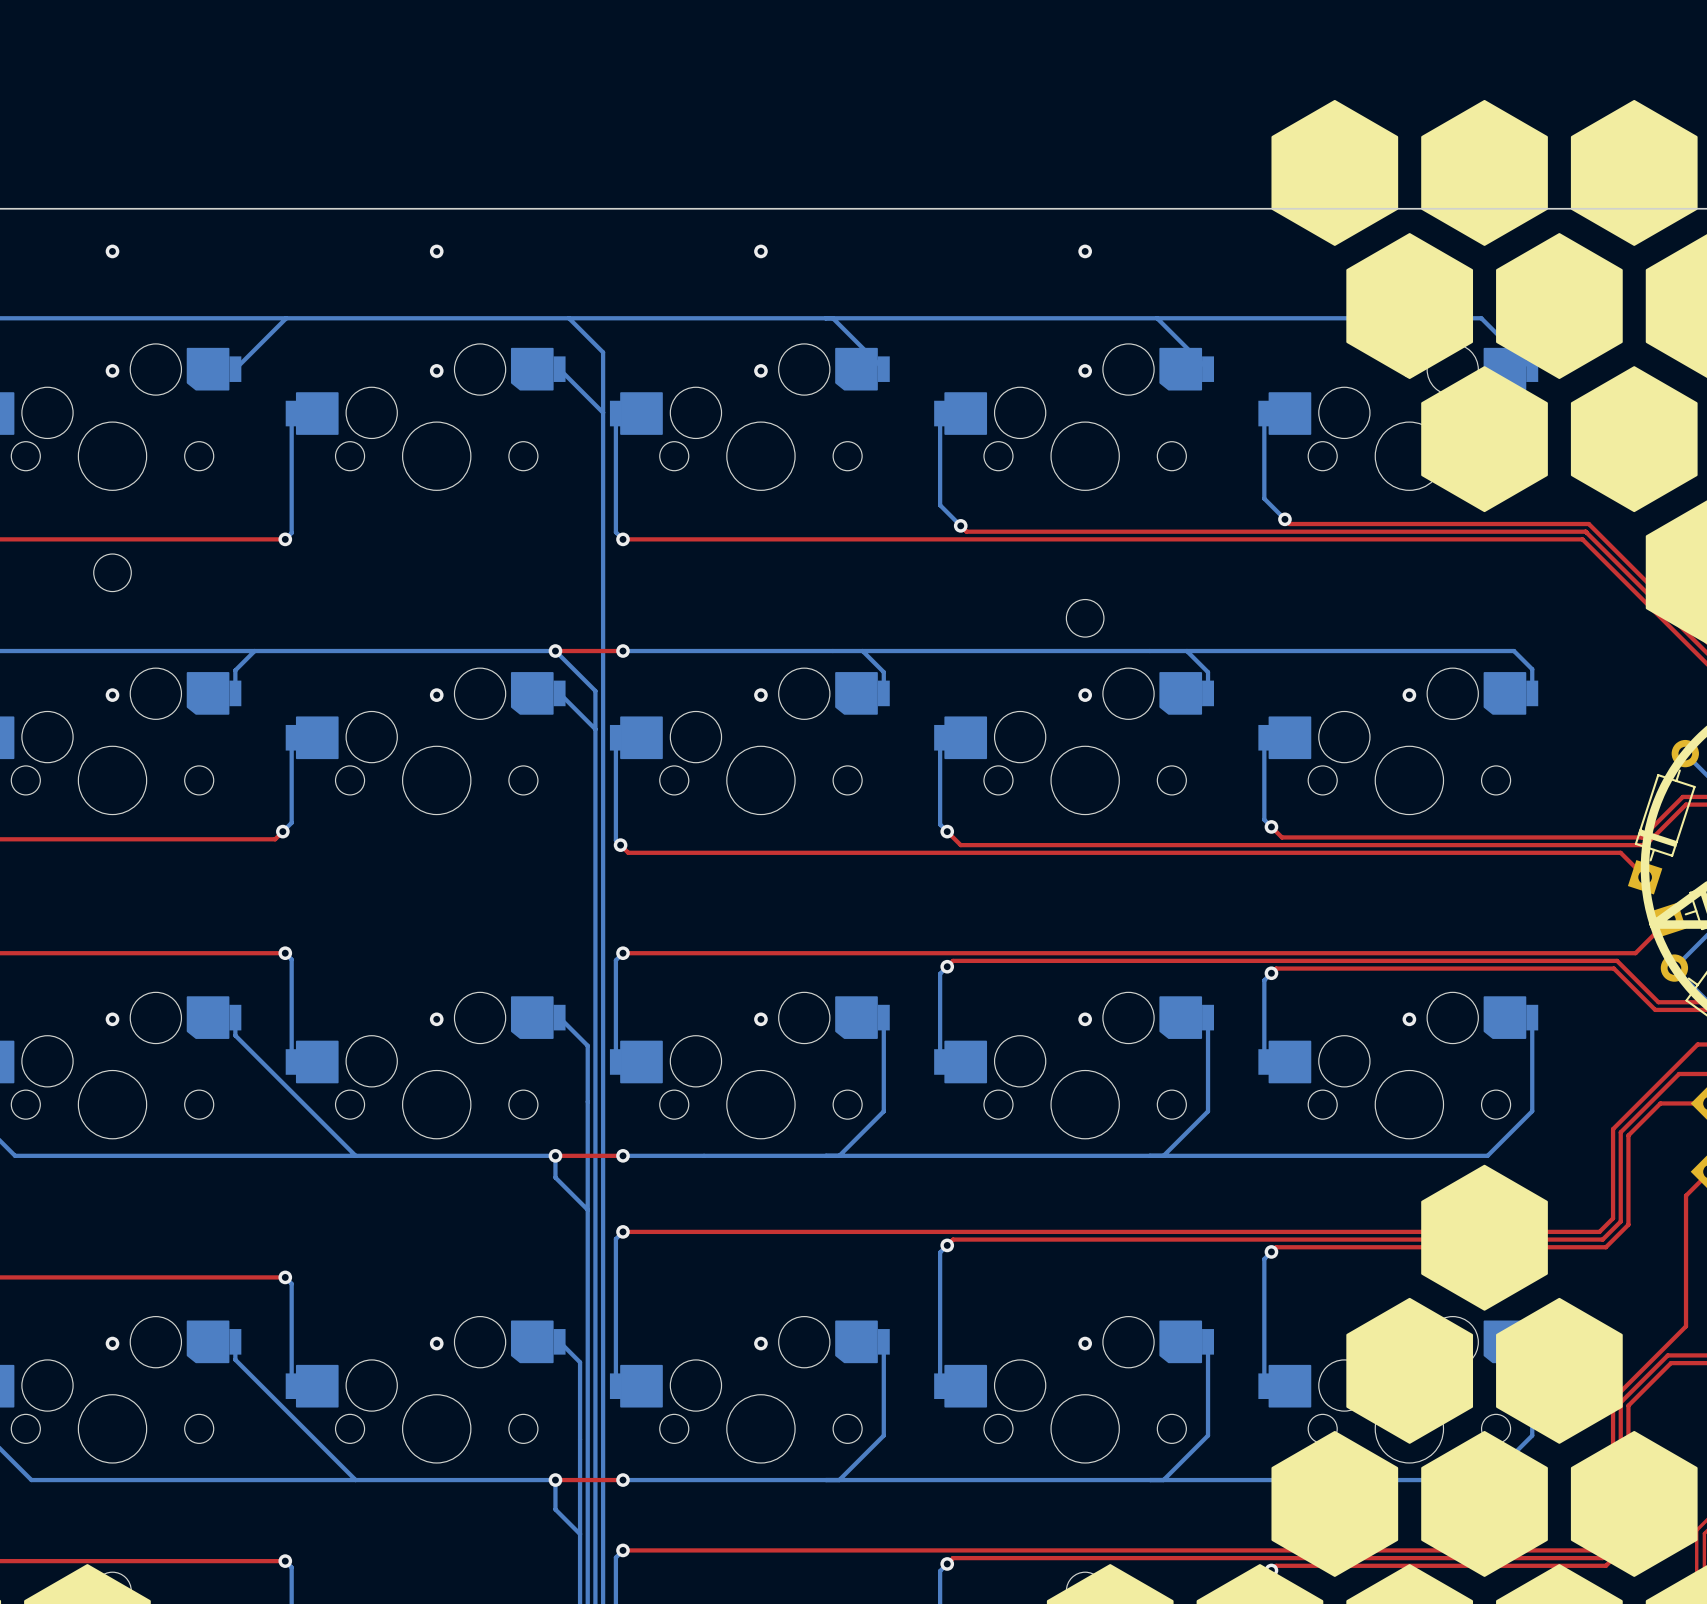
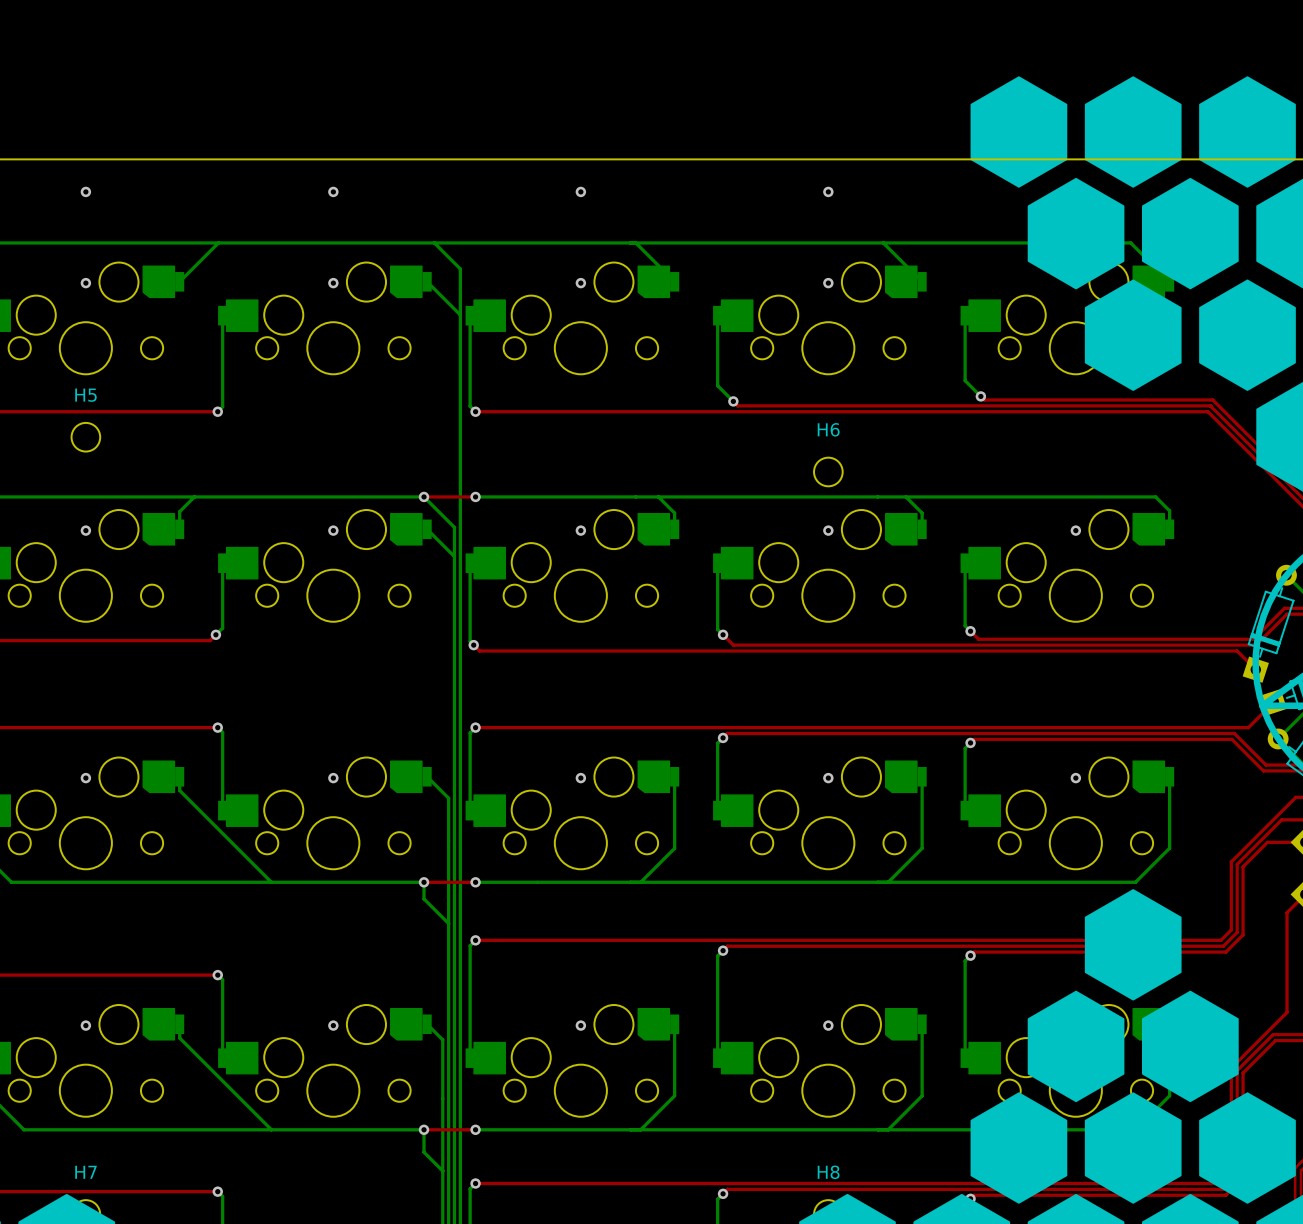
H5 name: none -> H5 (85, 395)
H6 name: none -> H6 (828, 429)
H7 name: none -> H7 (85, 1172)
H8 name: none -> H8 (828, 1172)

